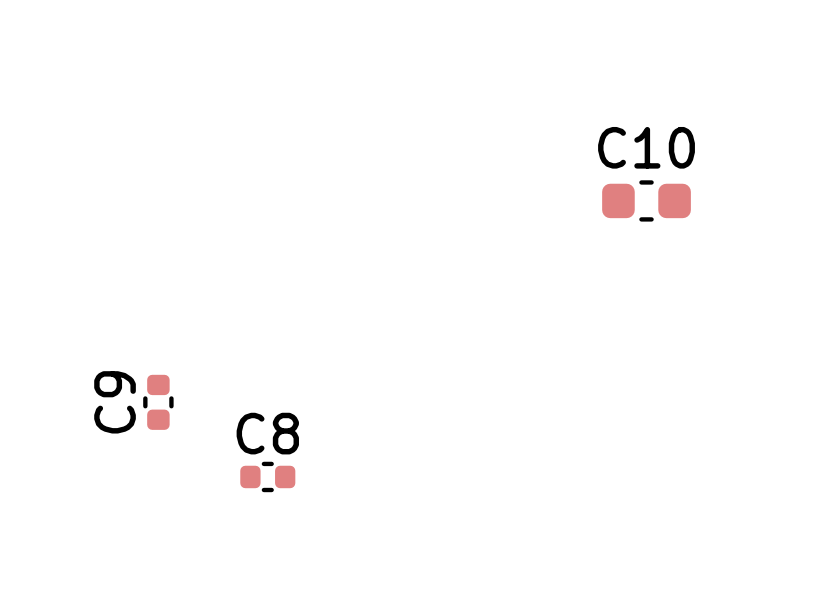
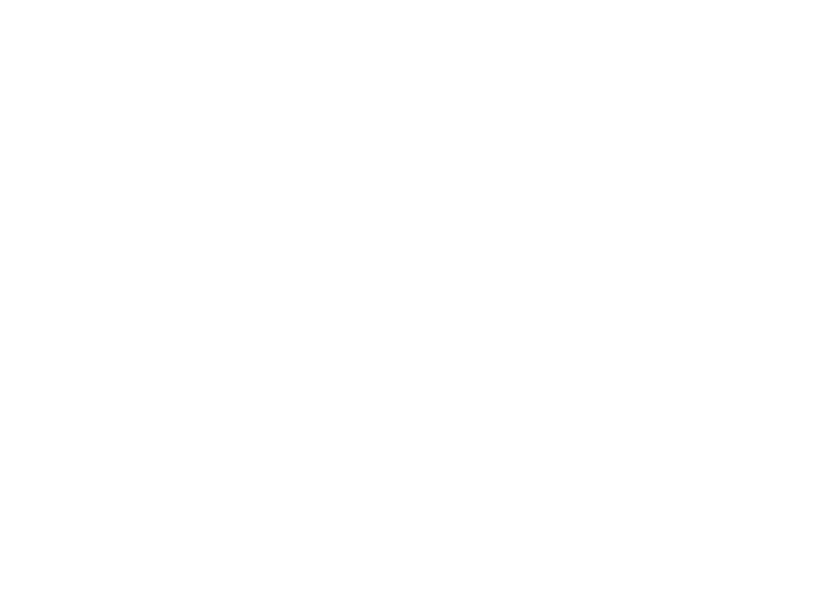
C10: (646, 200) -> none
C9: (158, 402) -> none
C8: (267, 476) -> none

